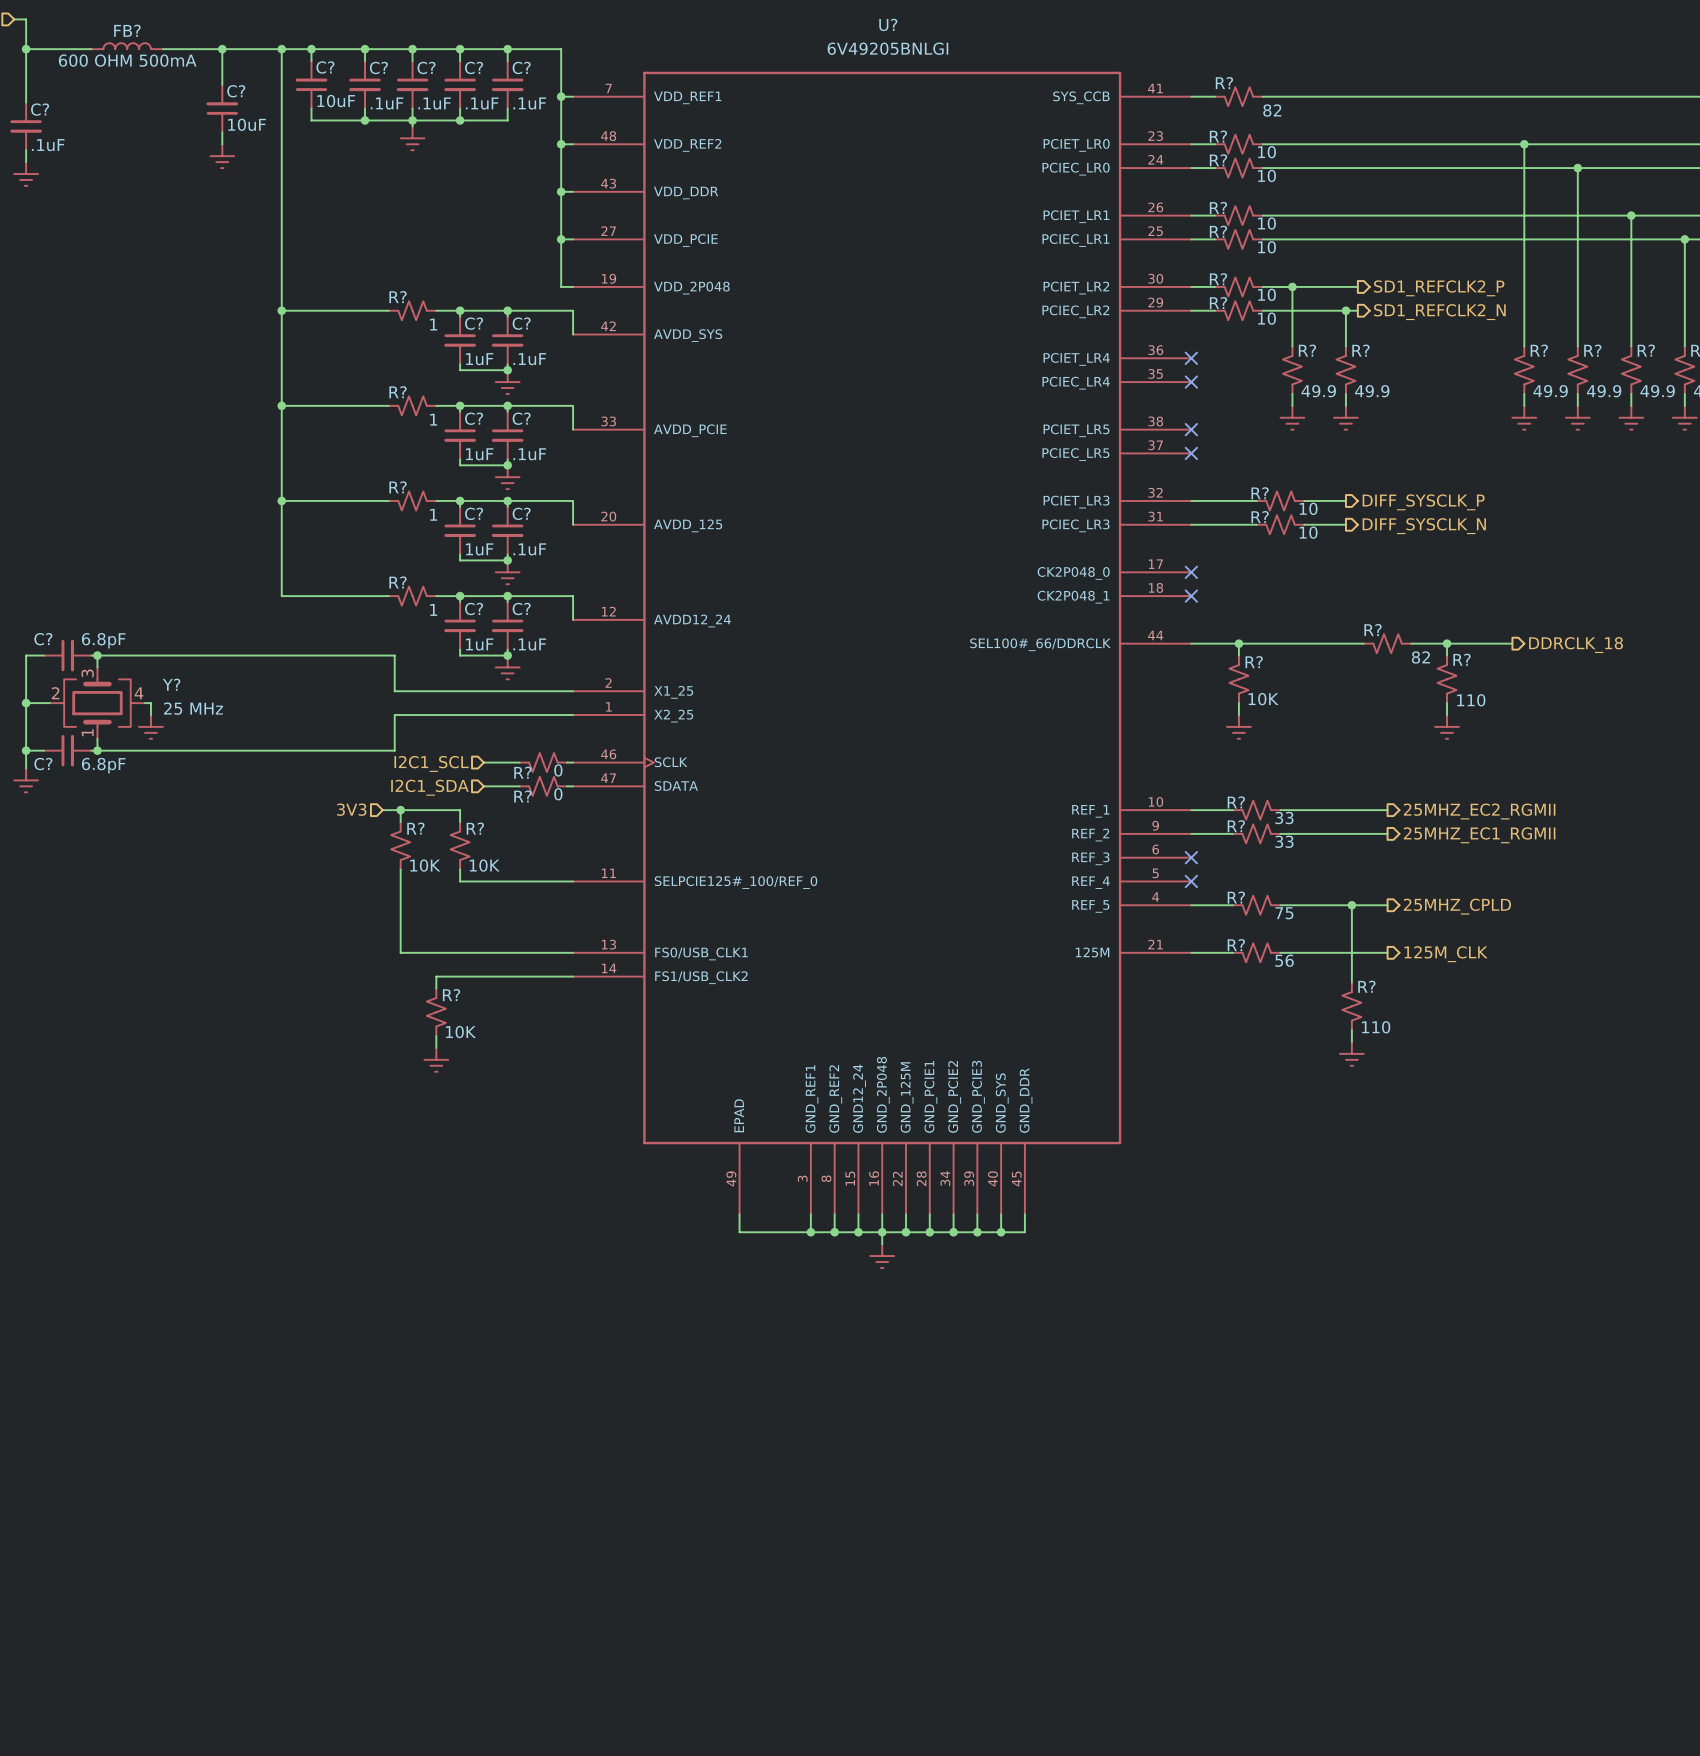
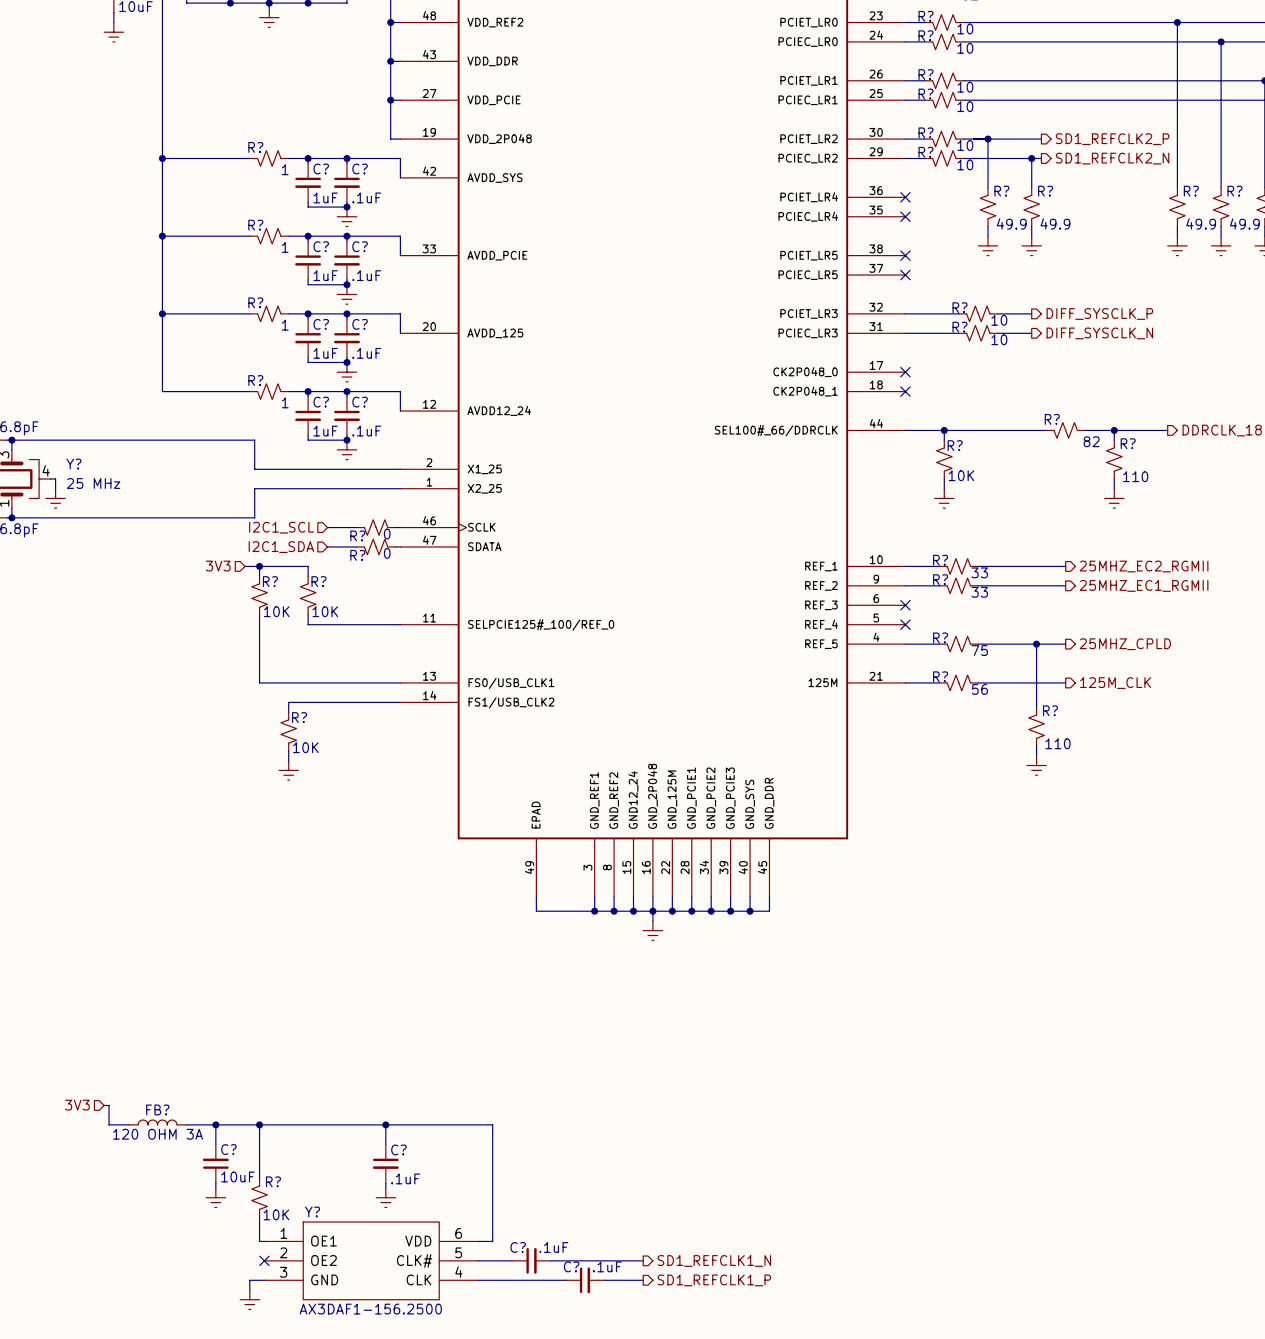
hierarchical label: none -> 3V3 (77, 1105)
wire: none -> (104, 1105) (109, 1105) (109, 1124) (128, 1124)
FB?: none -> 120 OHM 3A (157, 1122)
wire: none -> (186, 1124) (492, 1124) (492, 1241) (478, 1241)
wire: none -> (215, 1124) (215, 1144)
junction: none -> (215, 1124)
wire: none -> (259, 1124) (259, 1178)
junction: none -> (259, 1124)
wire: none -> (385, 1124) (385, 1144)
junction: none -> (385, 1124)
C?: none -> 10uF (215, 1163)
C?: none -> .1uF (385, 1163)
wire: none -> (215, 1183) (215, 1188)
wire: none -> (385, 1183) (385, 1188)
power symbol: none -> (215, 1197)
R?: none -> 10K (259, 1197)
power symbol: none -> (385, 1197)
wire: none -> (259, 1217) (259, 1241) (264, 1241)
no-connect mark: none -> (264, 1260)
Y?: none -> AX3DAF1-156.2500 (371, 1260)
wire: none -> (478, 1260) (512, 1260)
C?: none -> .1uF (531, 1260)
wire: none -> (550, 1260) (643, 1260)
hierarchical label: none -> SD1_REFCLK1_N (714, 1260)
wire: none -> (264, 1280) (249, 1280) (249, 1290)
wire: none -> (478, 1280) (565, 1280)
C?: none -> .1uF (584, 1280)
wire: none -> (604, 1280) (643, 1280)
hierarchical label: none -> SD1_REFCLK1_P (714, 1280)
power symbol: none -> (249, 1299)

